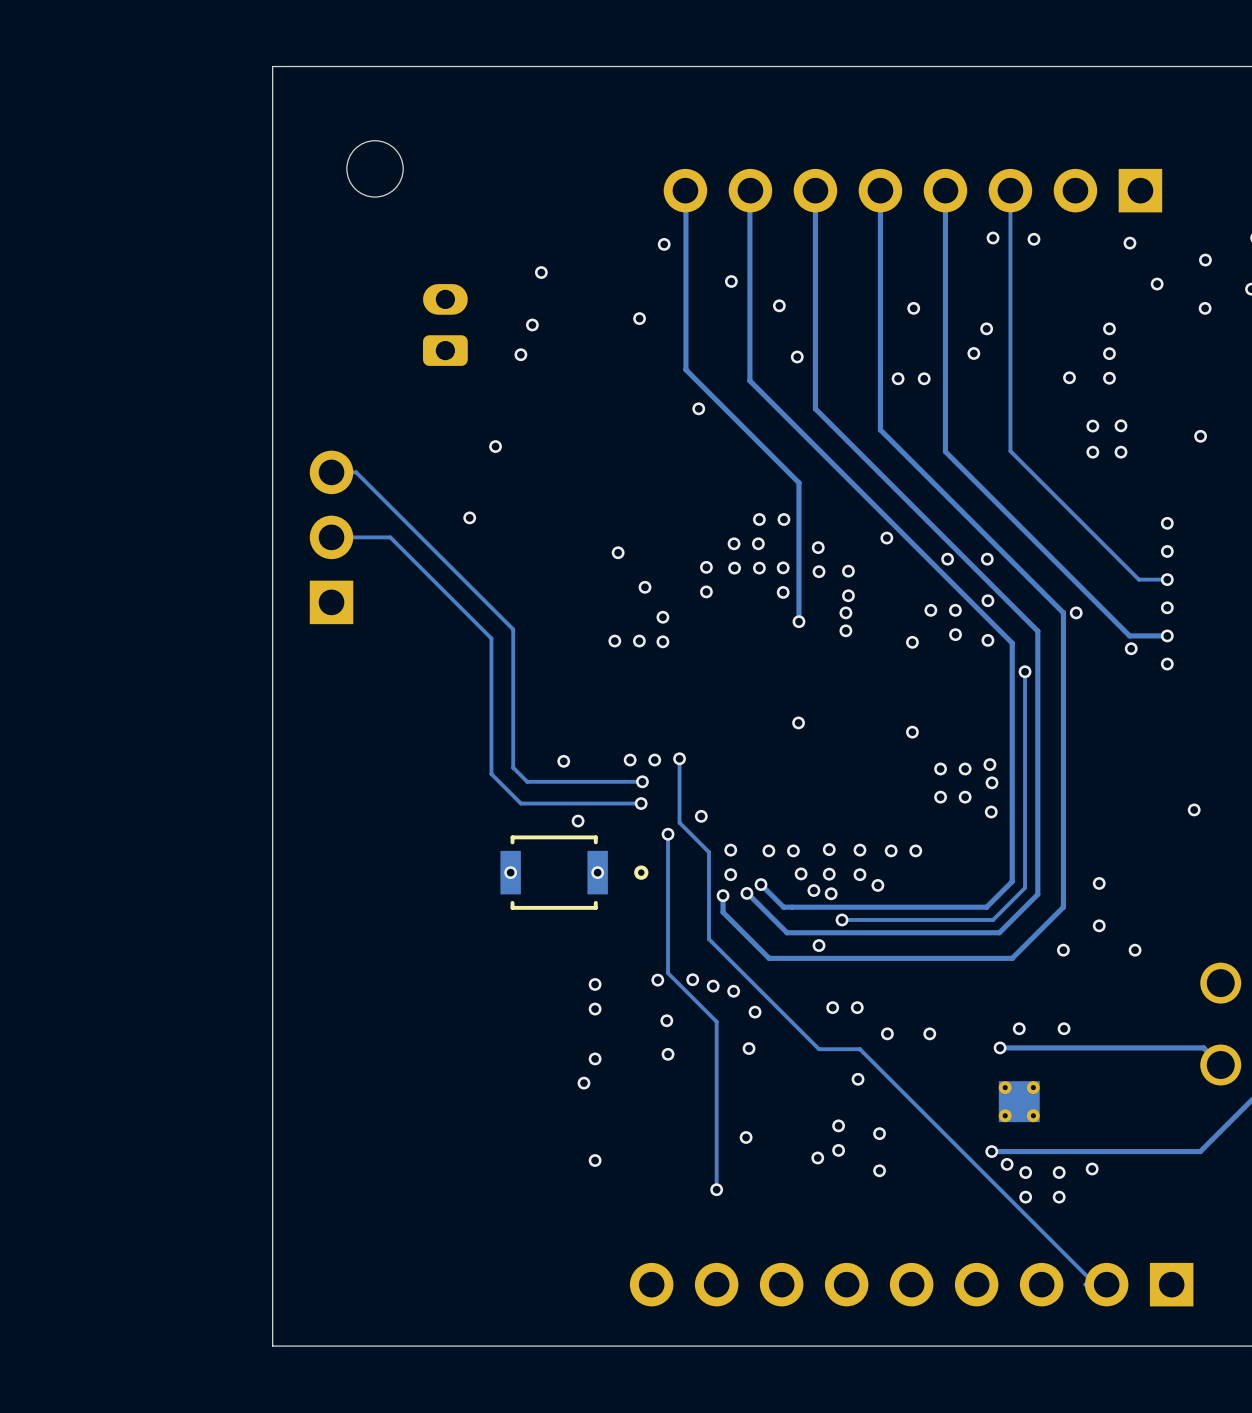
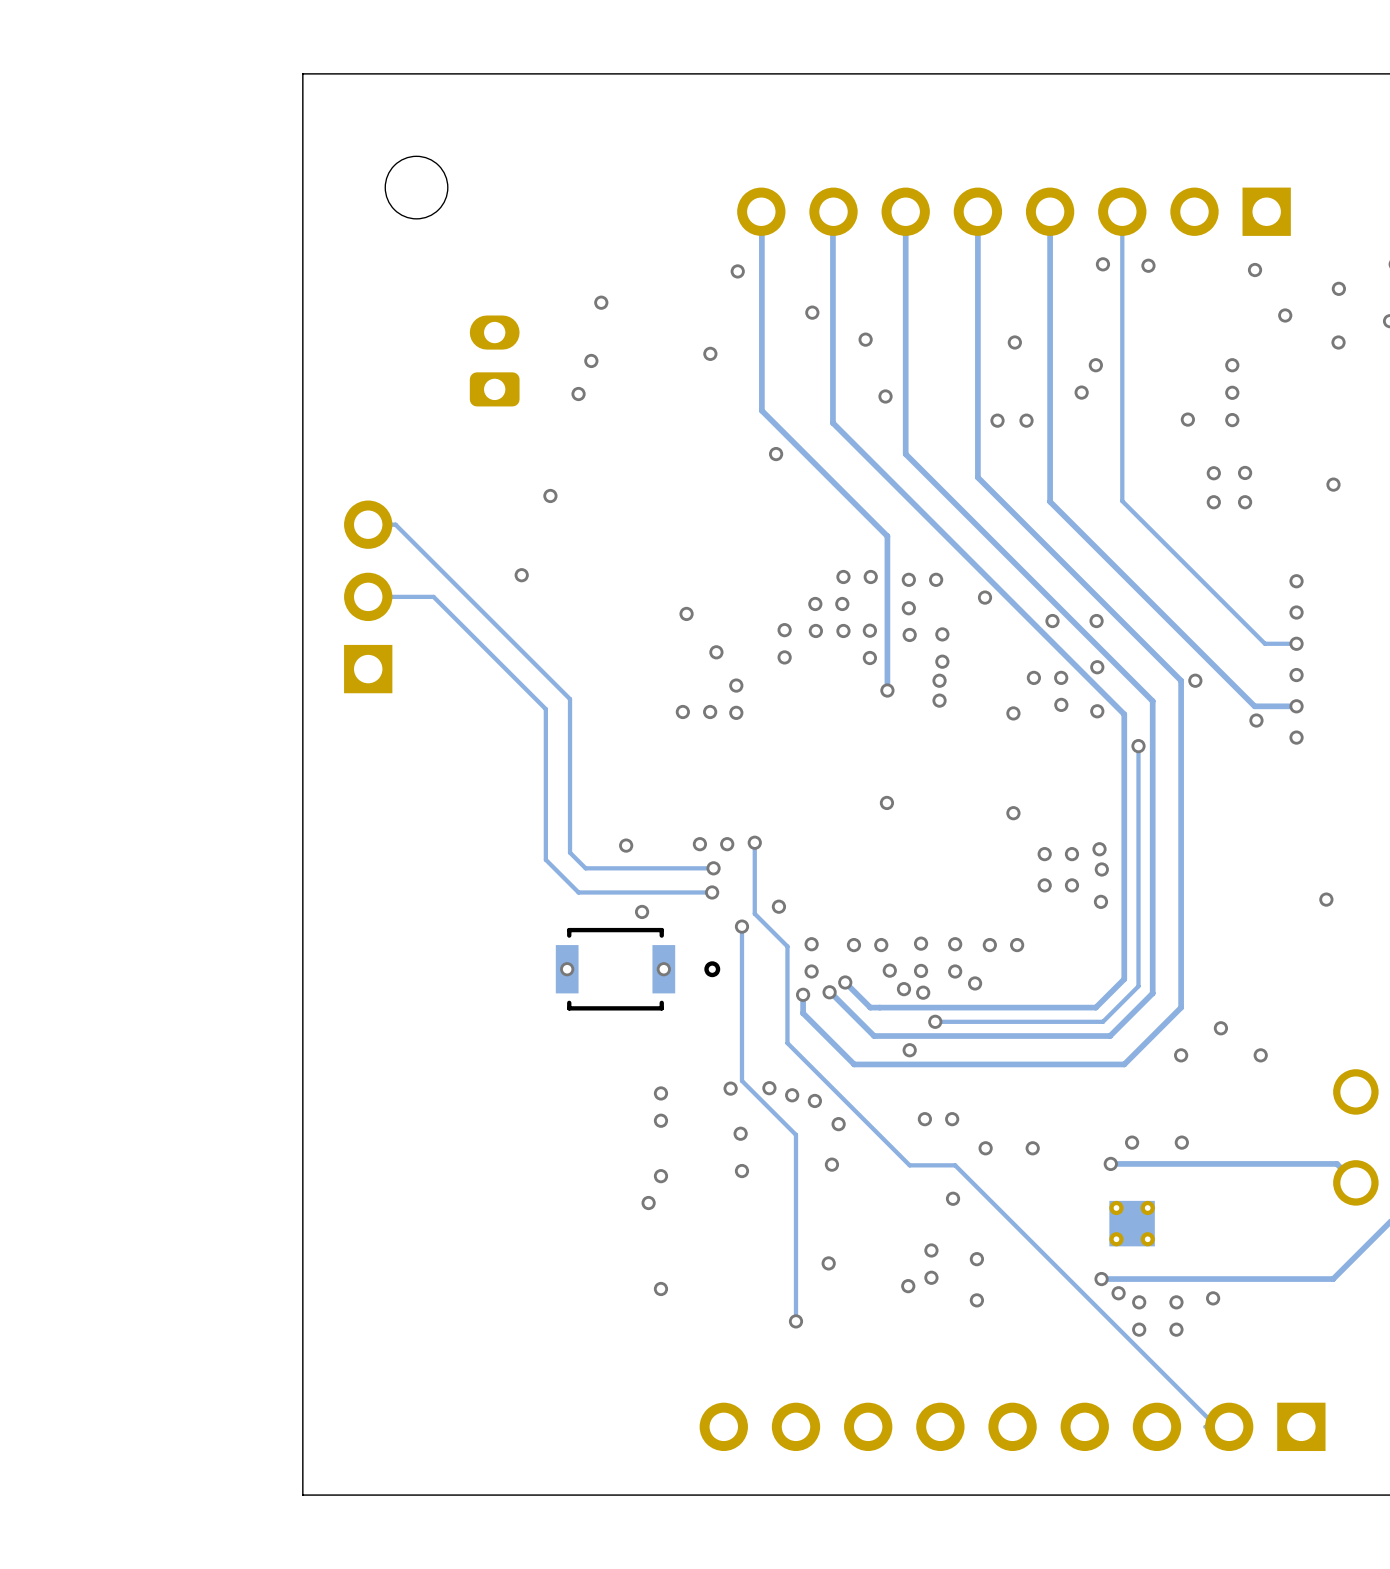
via: none -> (908, 579)
via: none -> (936, 579)
via: (1099, 883) -> none

